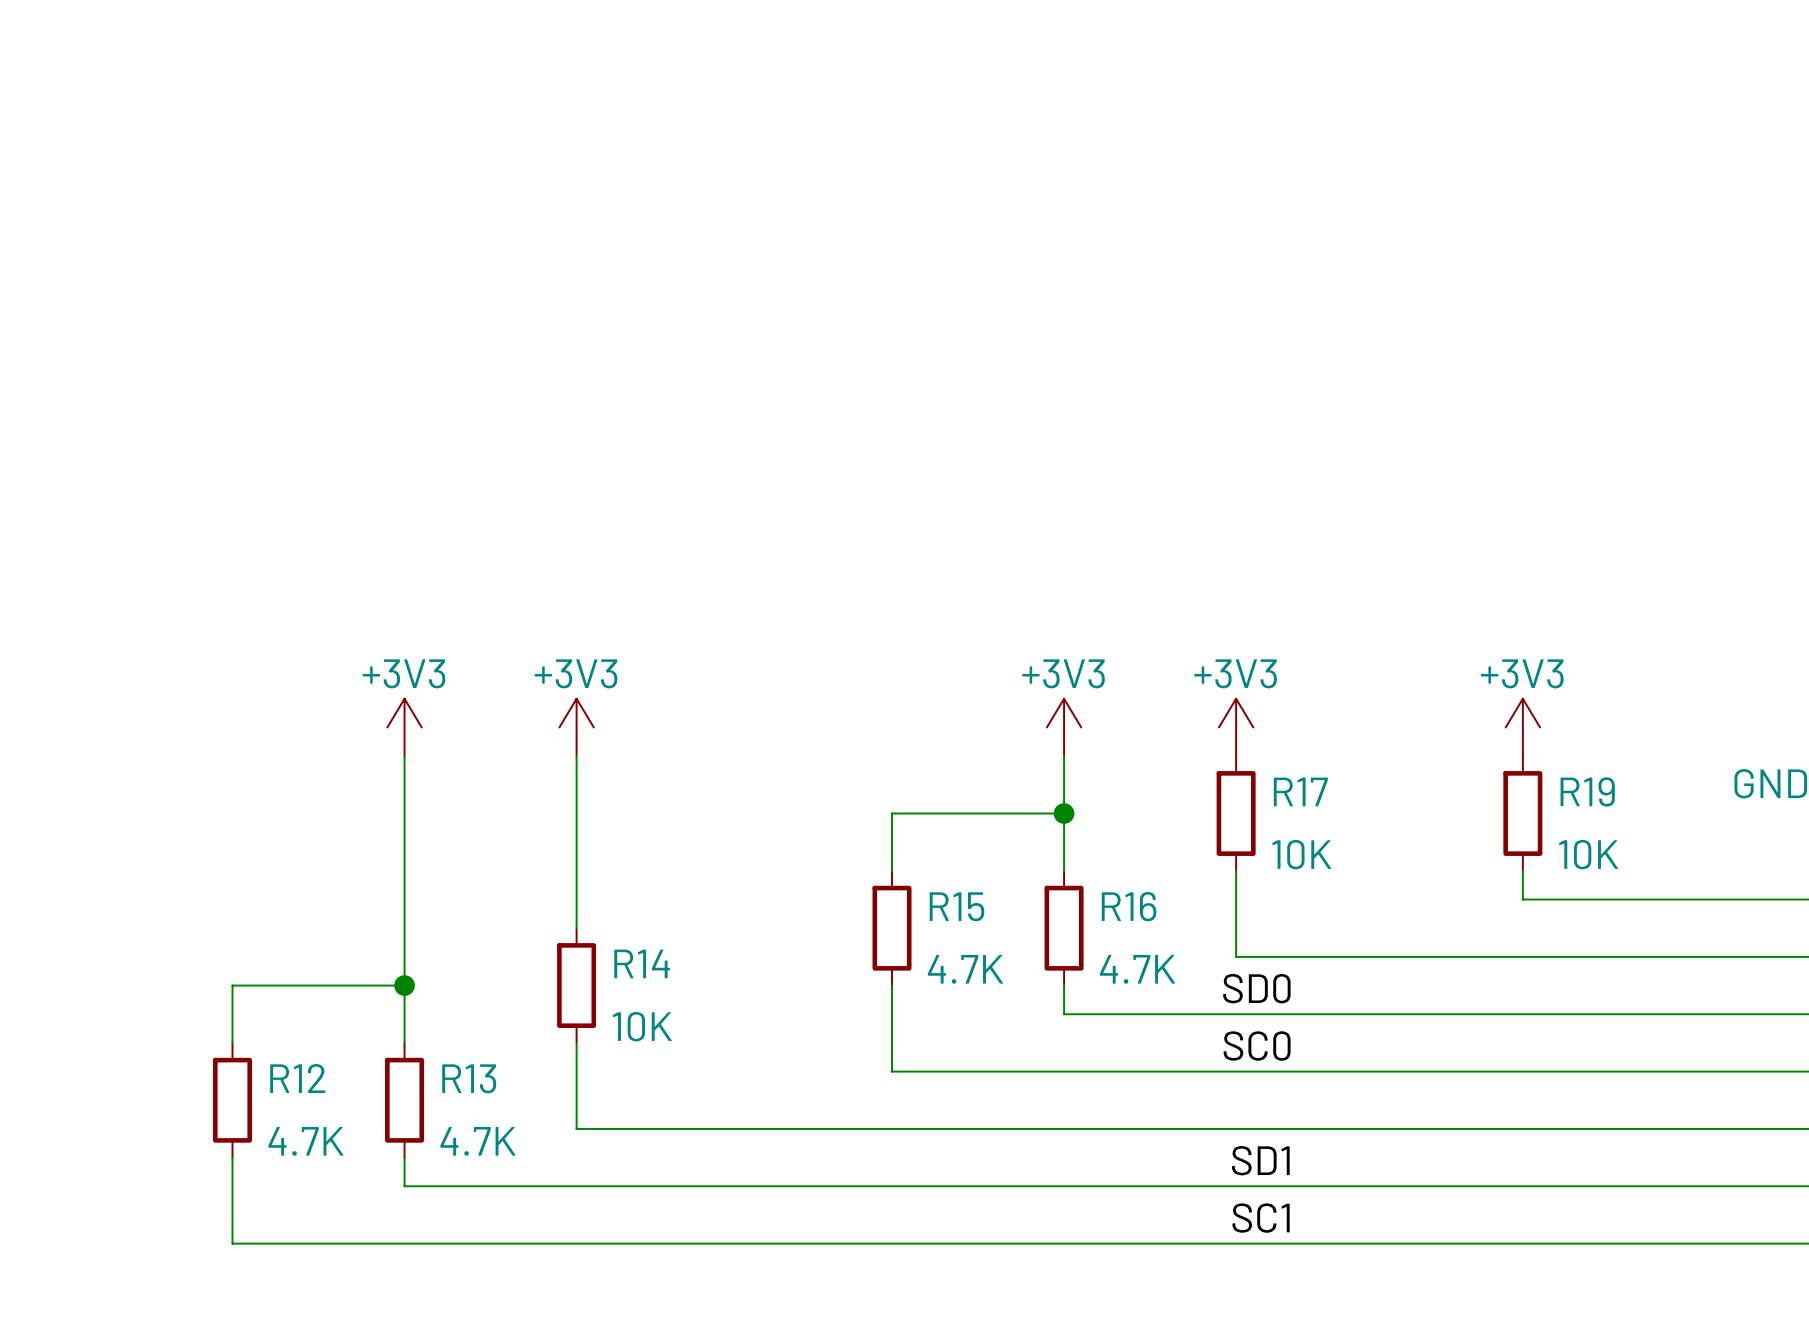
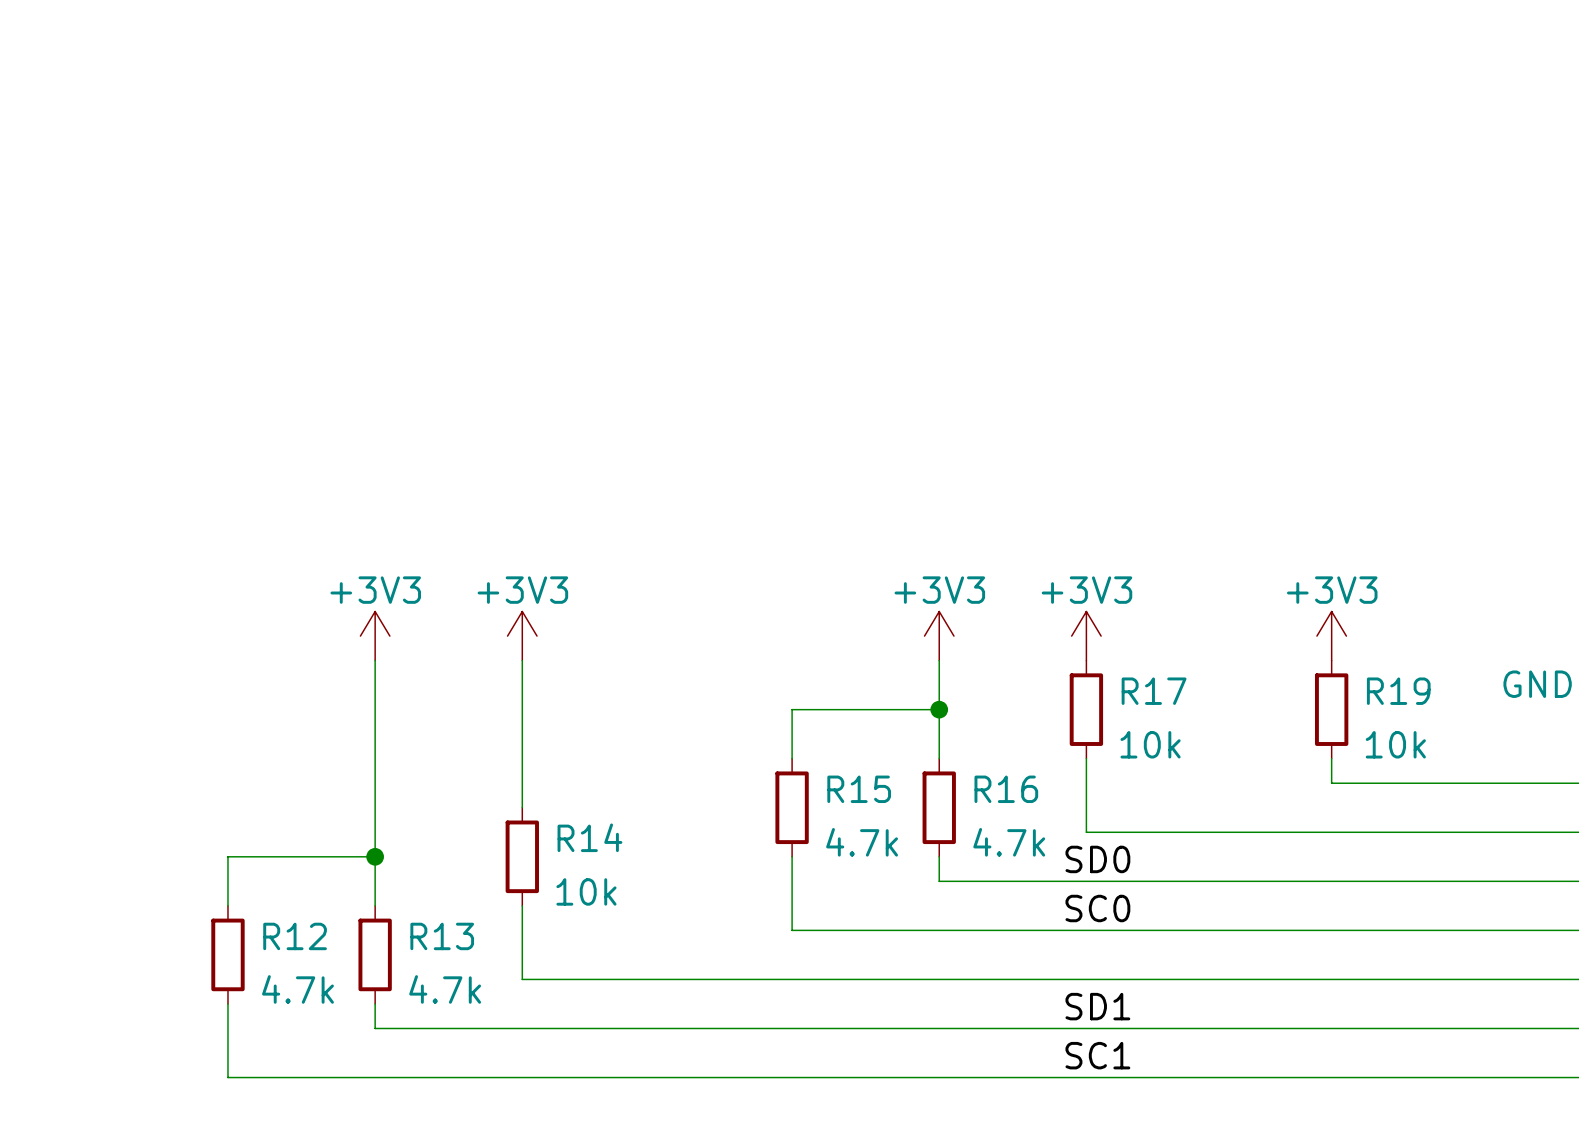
R17 value: 10K (1301, 854) -> 10k (1150, 744)
R19 value: 10K (1588, 854) -> 10k (1395, 744)
R15 value: 4.7K (965, 969) -> 4.7k (862, 842)
R16 value: 4.7K (1137, 969) -> 4.7k (1009, 842)
R14 value: 10K (642, 1026) -> 10k (586, 891)
R12 value: 4.7K (305, 1141) -> 4.7k (297, 989)
R13 value: 4.7K (478, 1141) -> 4.7k (445, 989)

